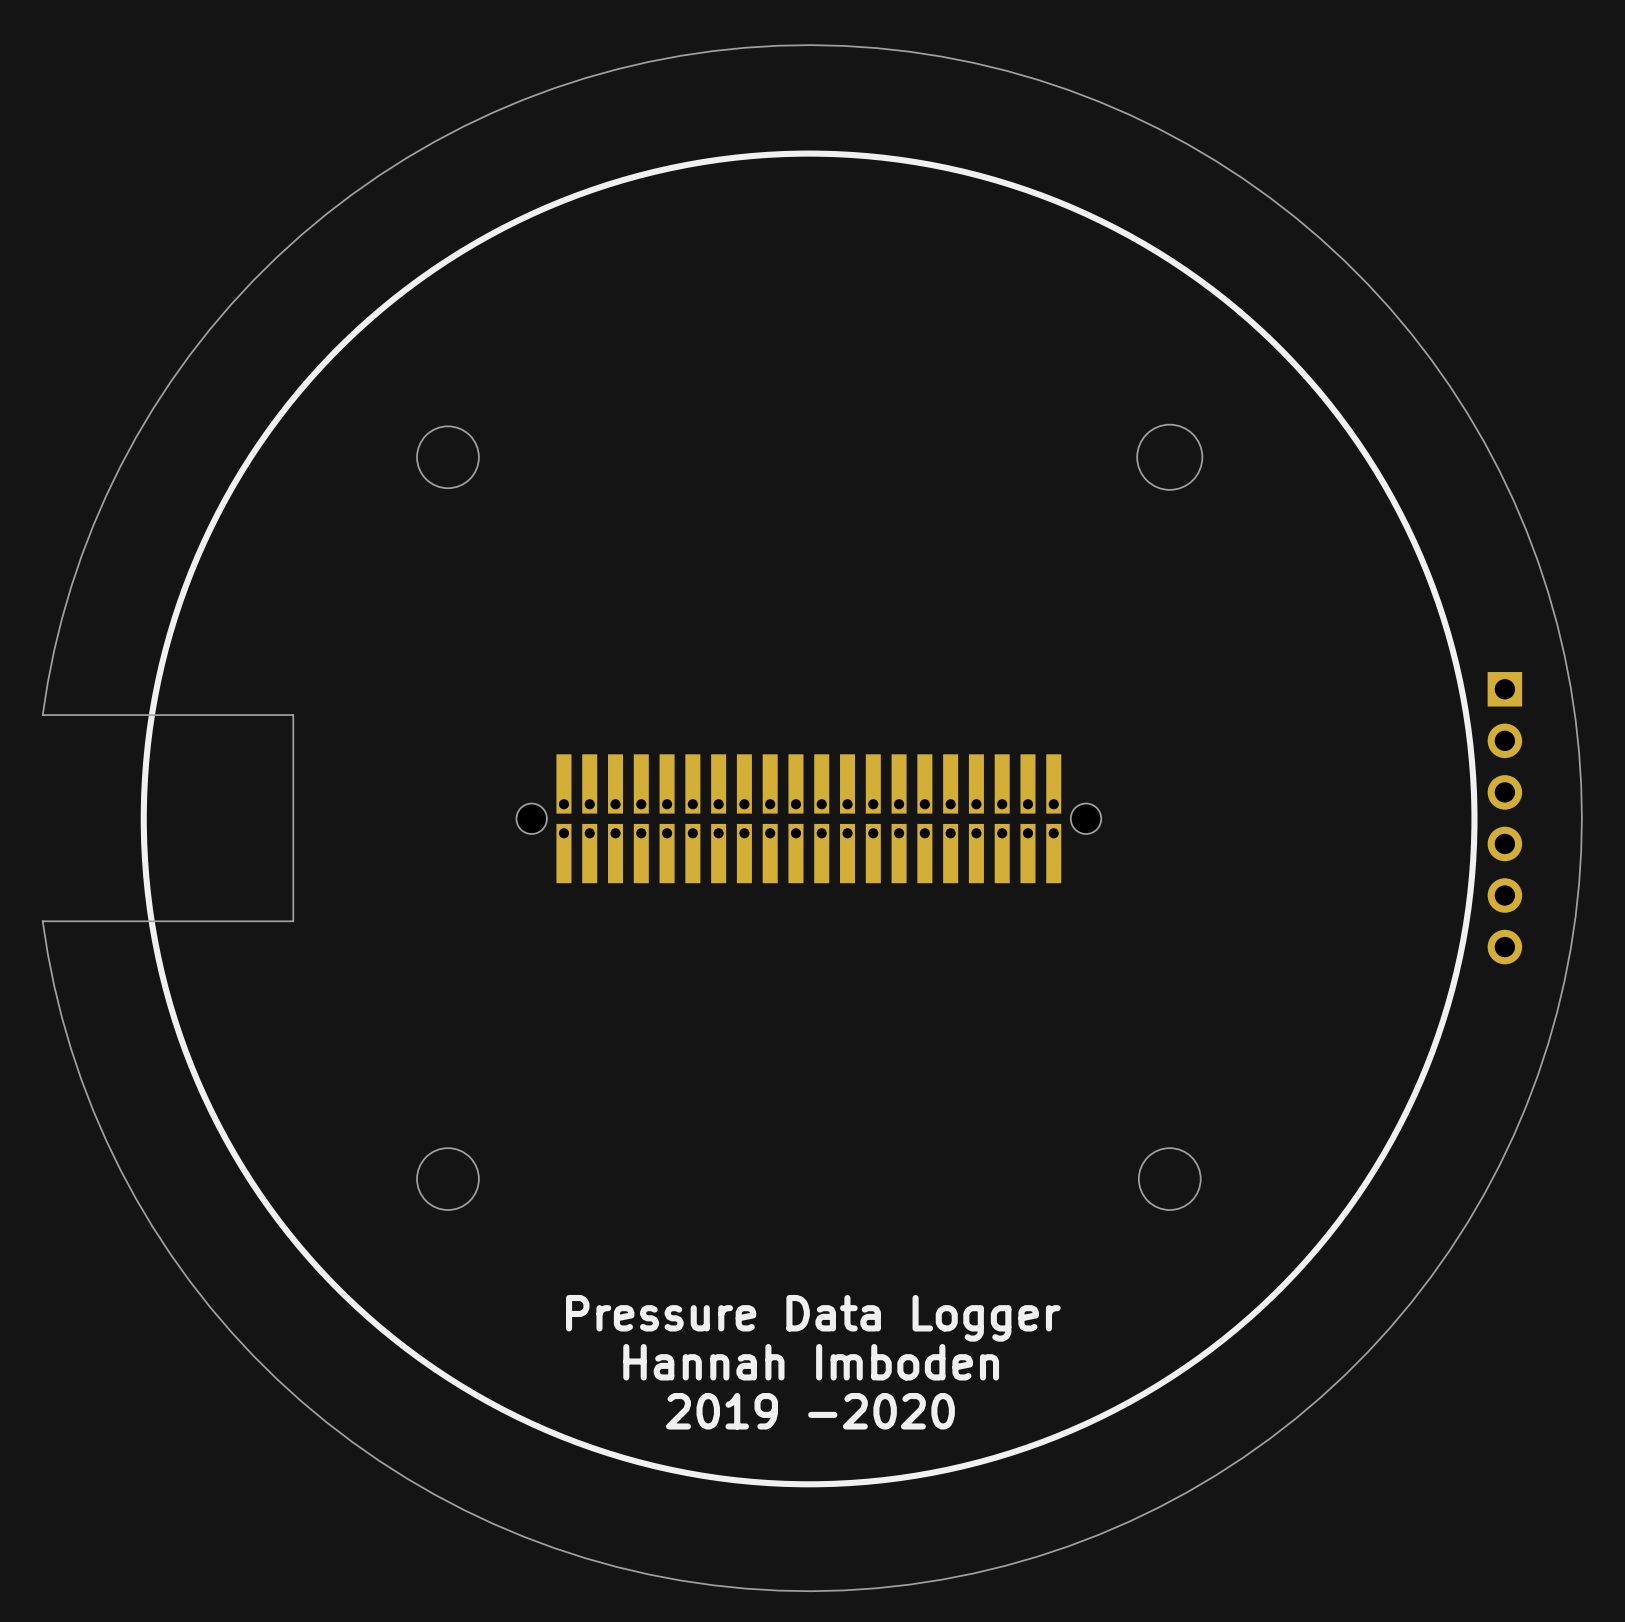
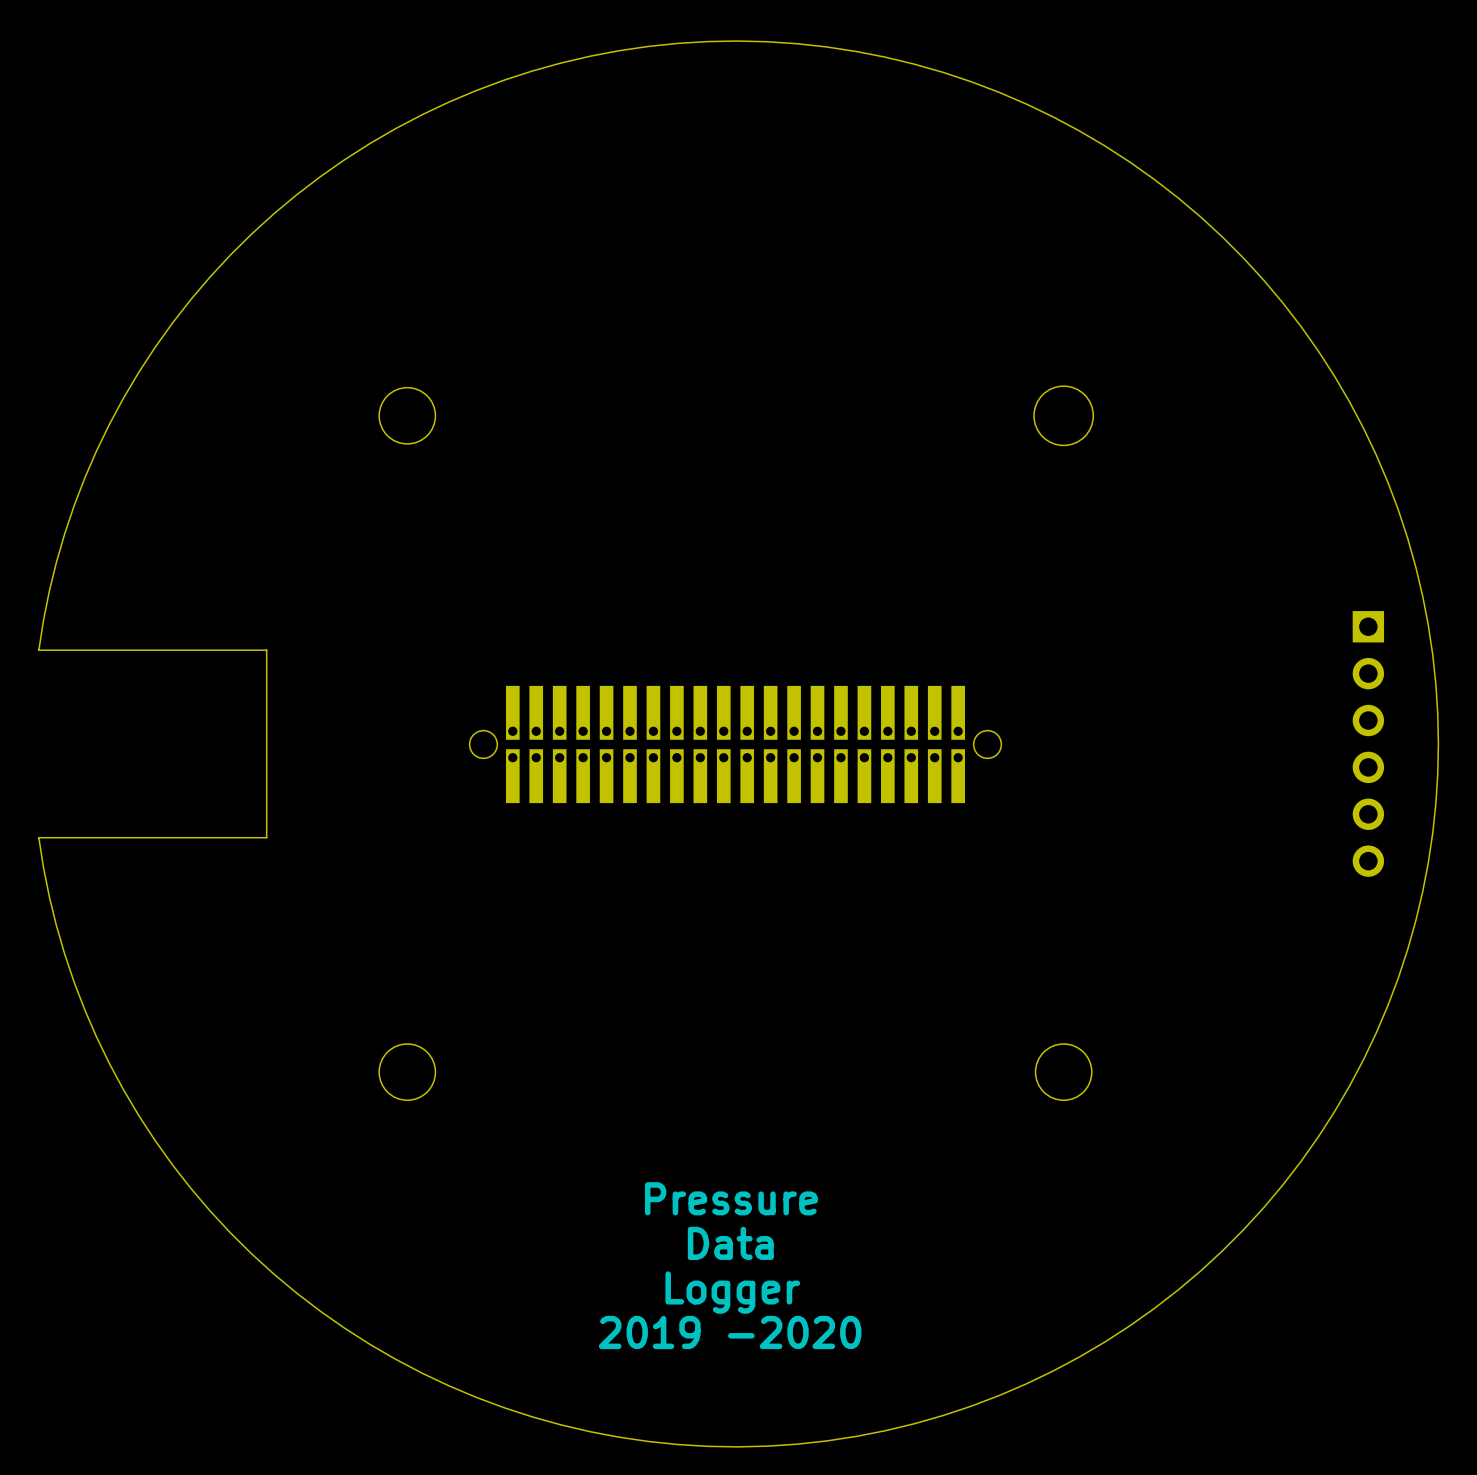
drawing: [140, 150, 1478, 1488] -> none
text: Pressure Data Logger (813, 1318) -> Pressure (731, 1198)
text: Hannah Imboden (811, 1362) -> Data (730, 1243)
text position: 2019 -2020 (810, 1411) -> 2019 -2020 (730, 1332)
text: none -> Logger (732, 1292)

